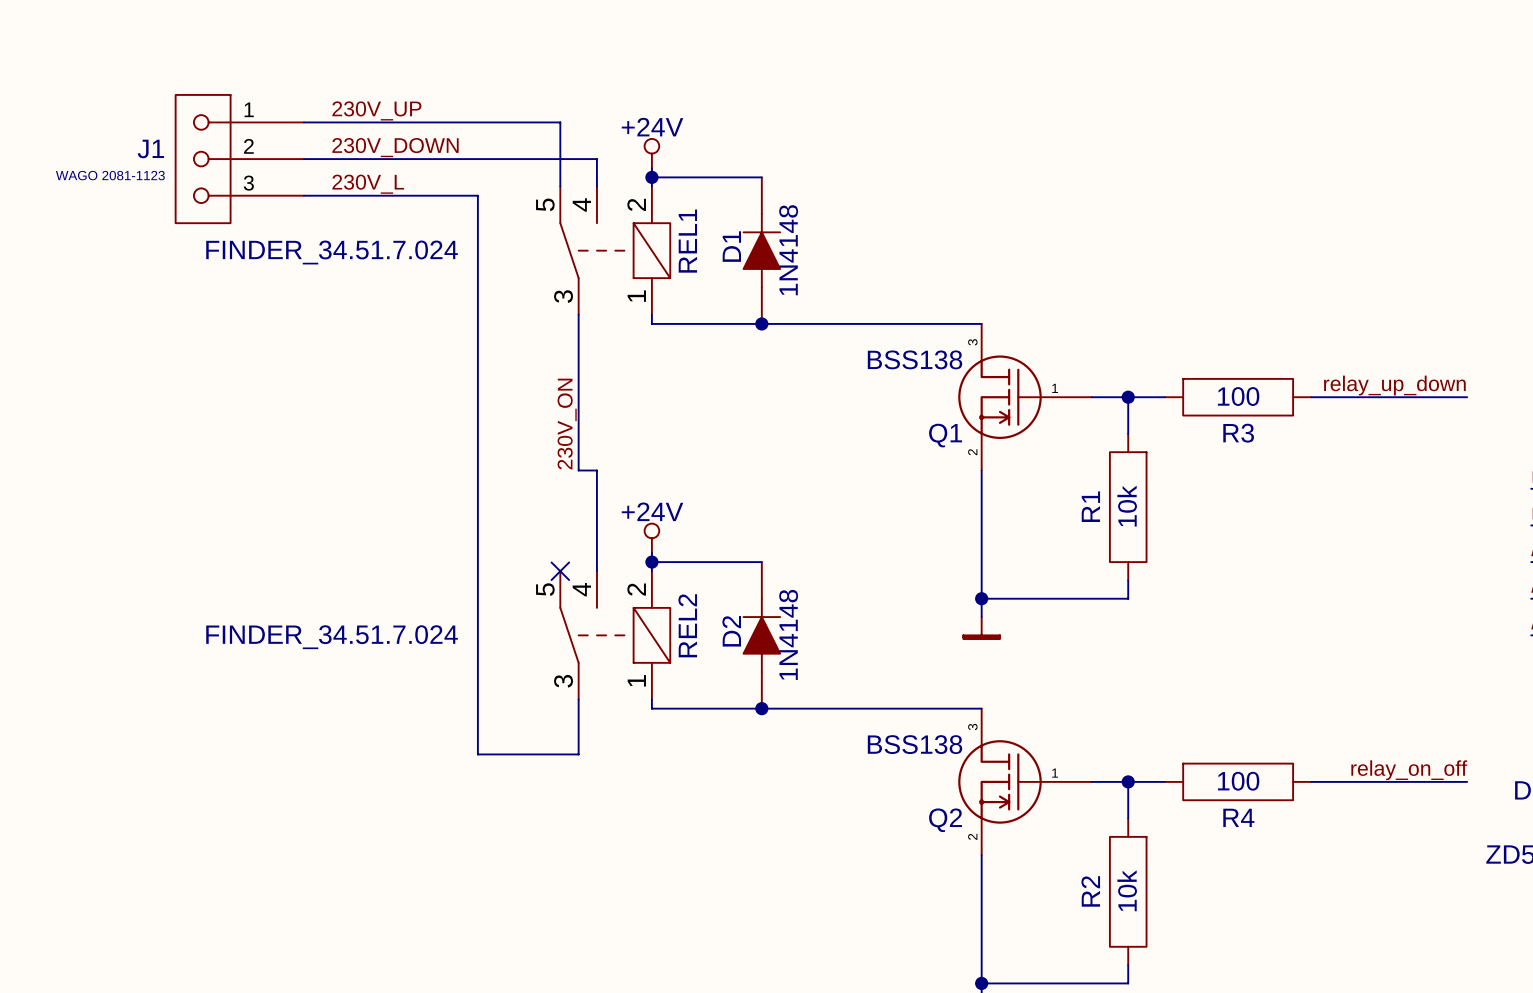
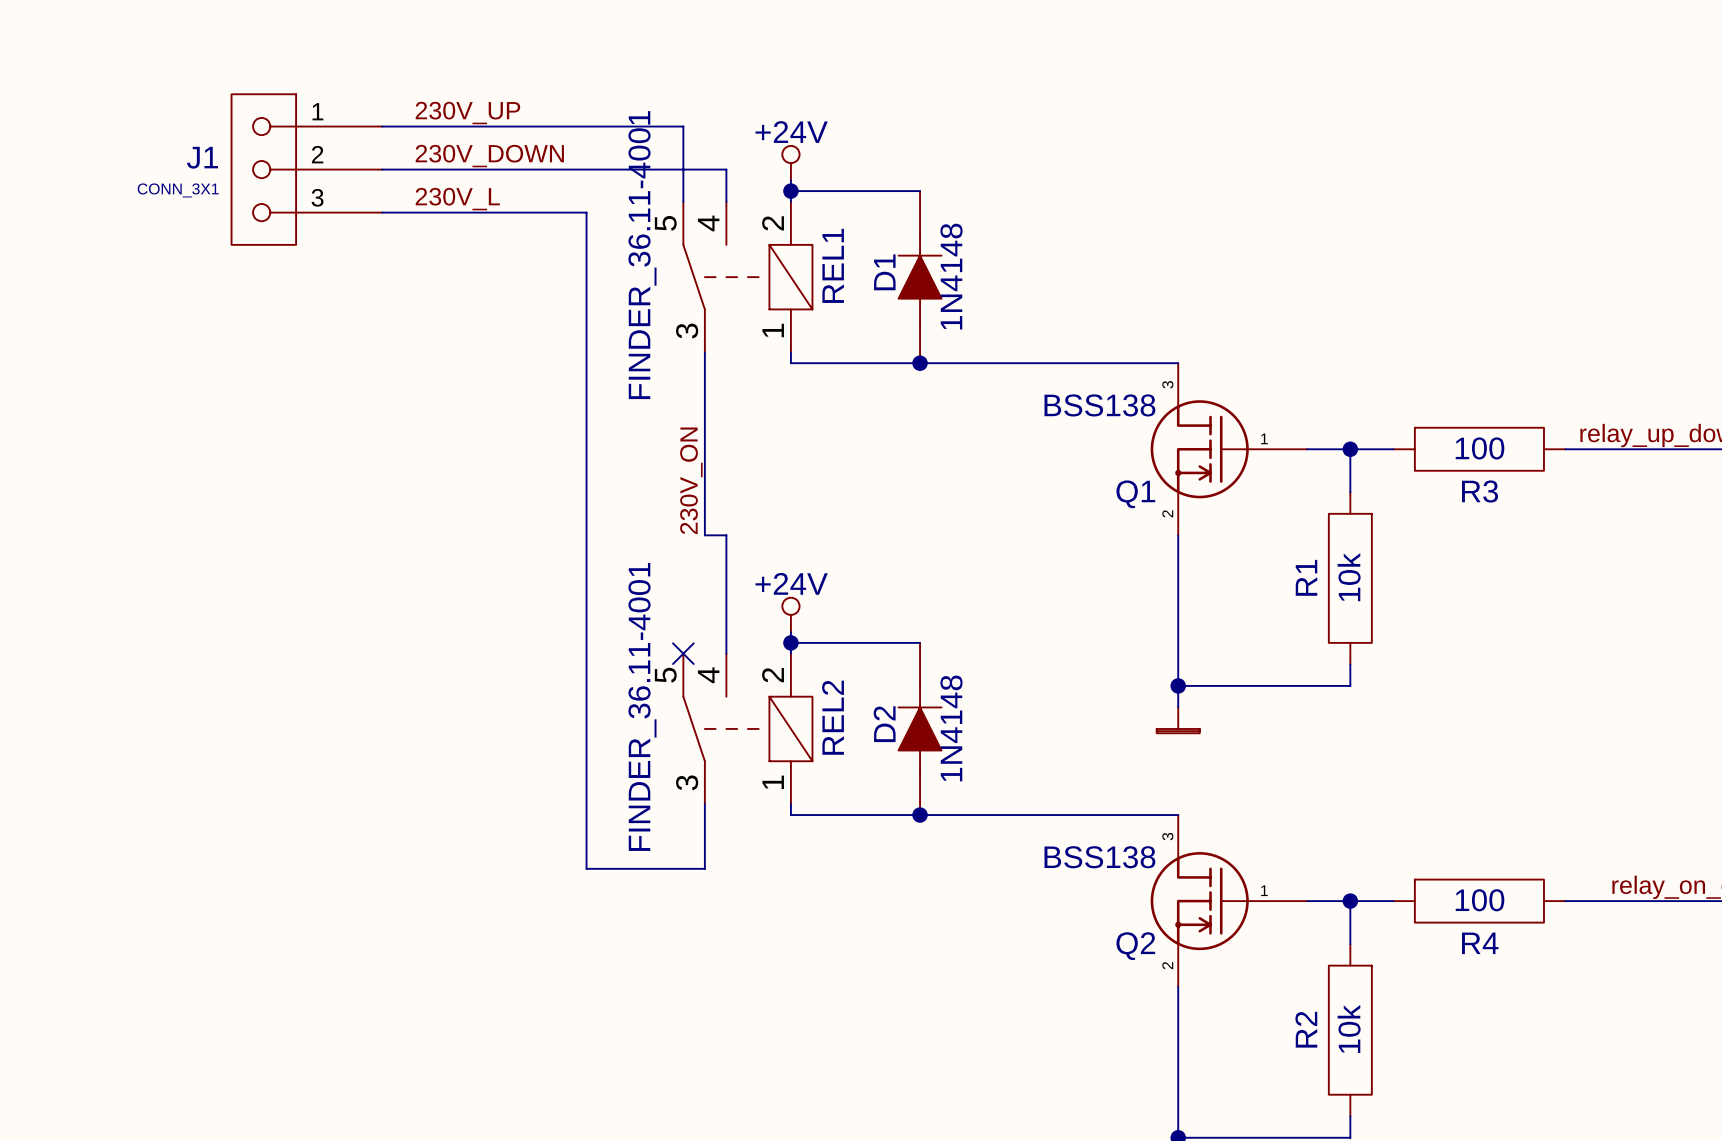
J1 value: WAGO 2081-1123 (110, 175) -> CONN_3X1 (178, 190)
REL1 value: FINDER_34.51.7.024 (332, 252) -> FINDER_36.11-4001 (642, 255)
REL2 value: FINDER_34.51.7.024 (332, 637) -> FINDER_36.11-4001 (642, 706)

